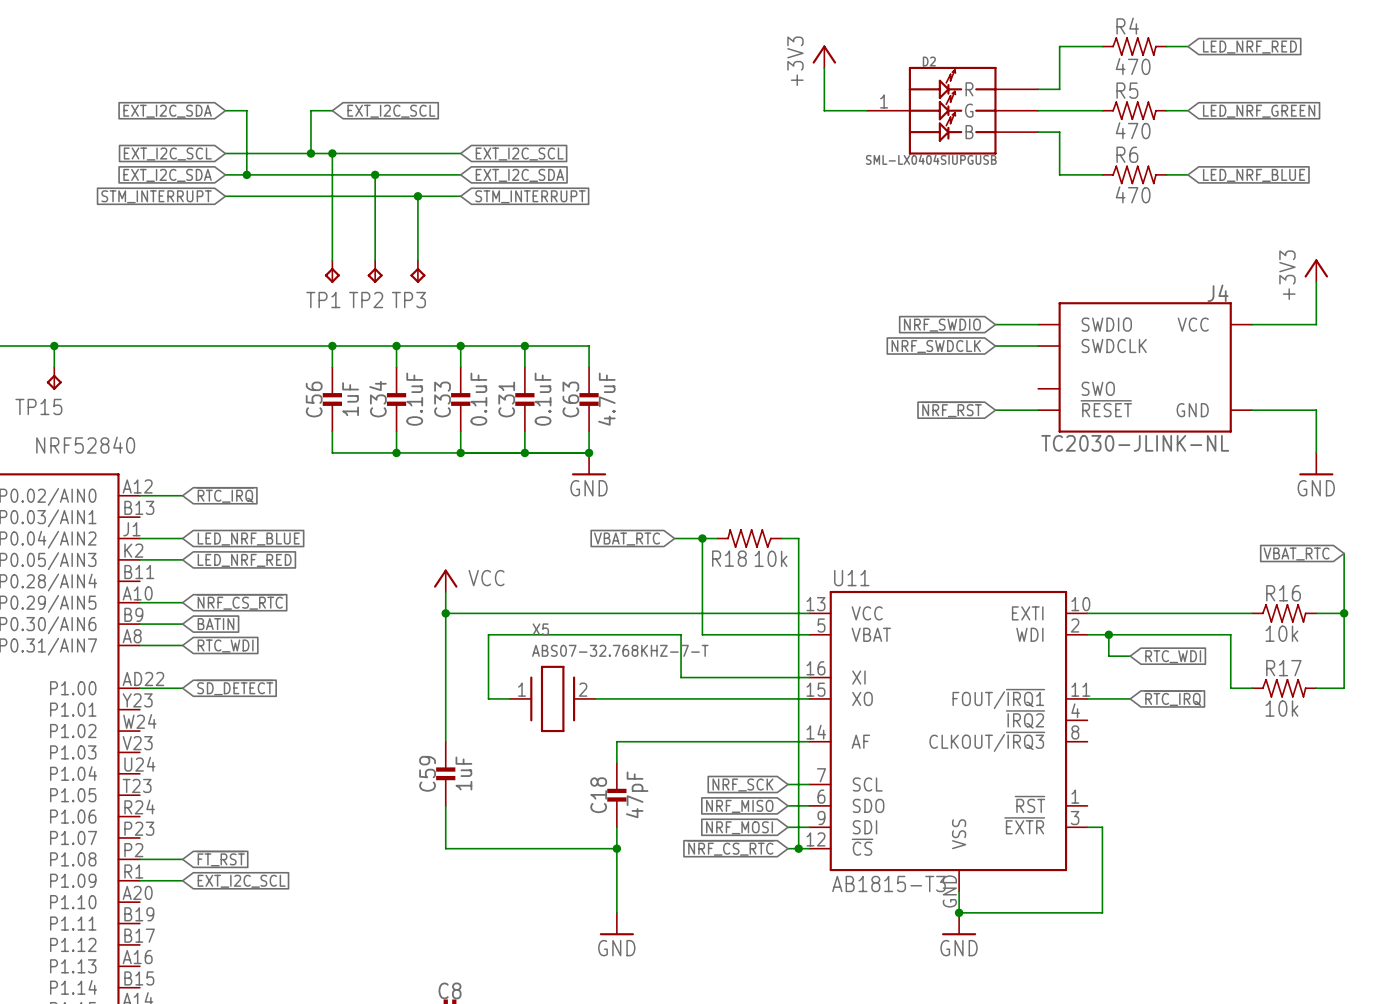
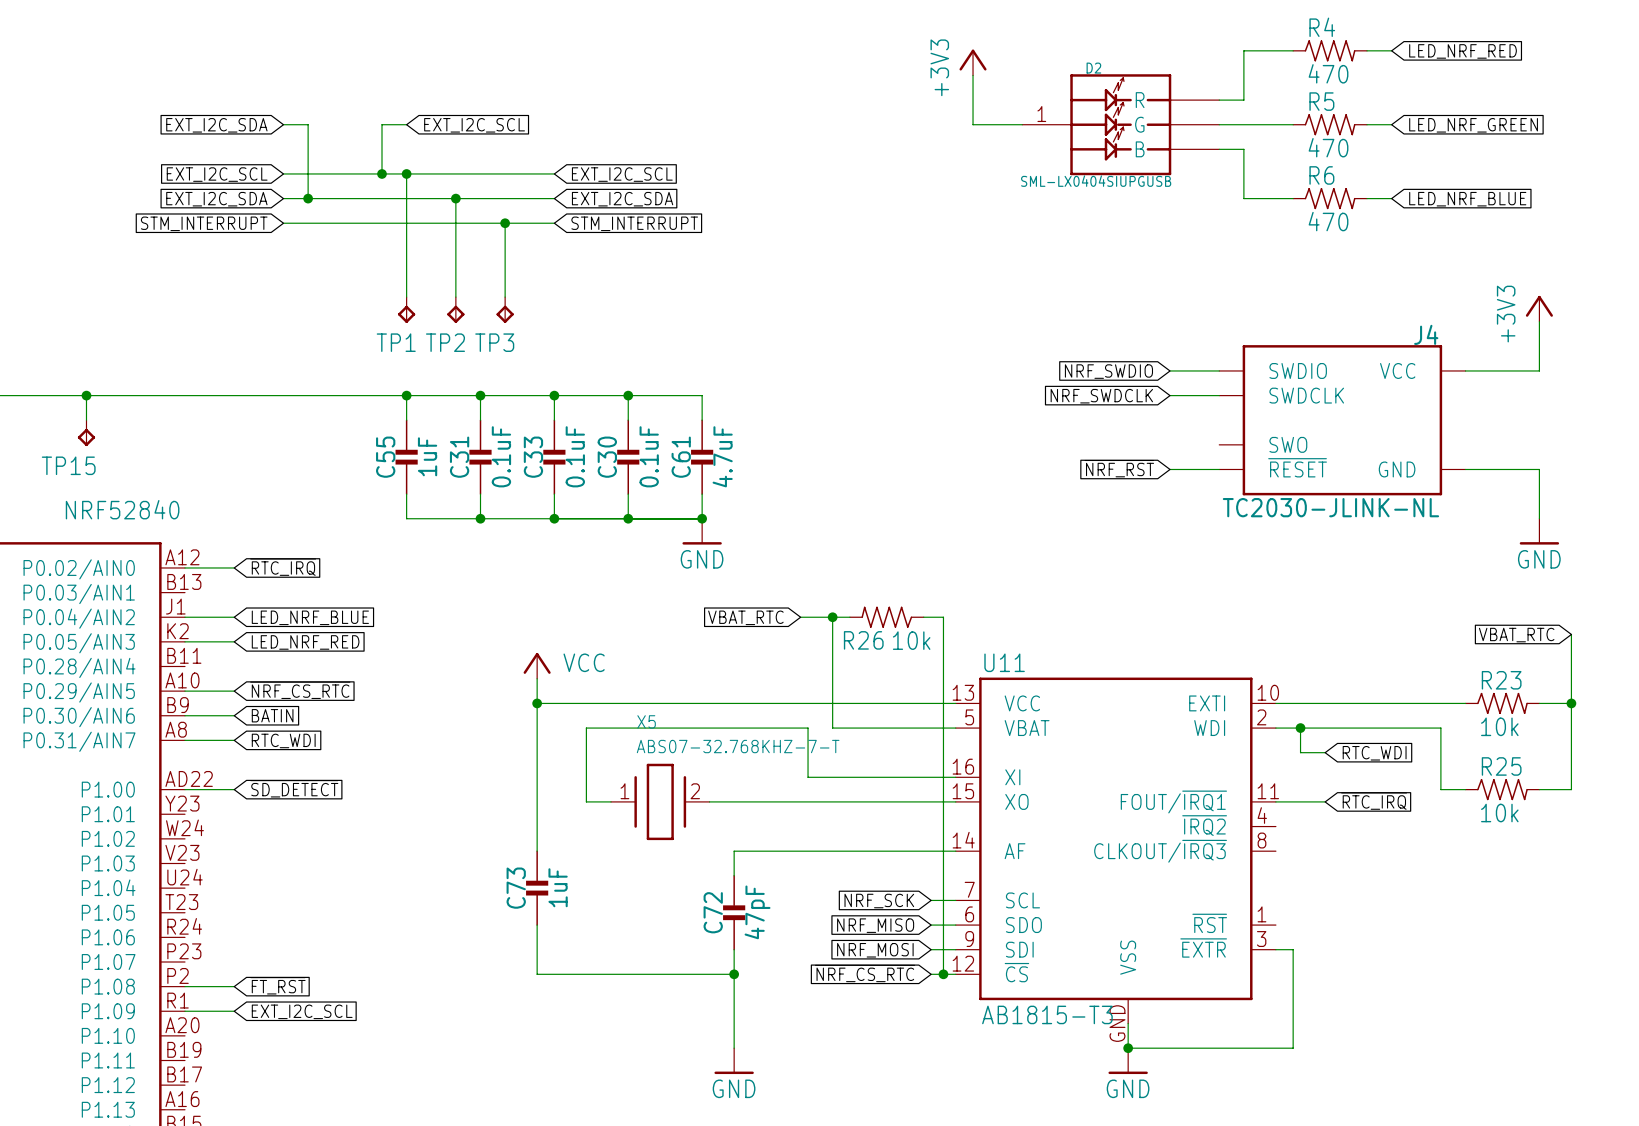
C56 name: C56 (314, 399) -> C55 (385, 457)
C34 name: C34 (378, 399) -> C31 (459, 457)
C31 name: C31 (506, 399) -> C30 (607, 457)
C63 name: C63 (570, 399) -> C61 (681, 457)
R18 name: R18 (729, 558) -> R26 (863, 640)
R16 name: R16 (1283, 593) -> R23 (1501, 680)
R17 name: R17 (1283, 668) -> R25 (1501, 766)
C59 name: C59 (427, 773) -> C73 (516, 888)
C18 name: C18 (598, 795) -> C72 (713, 912)

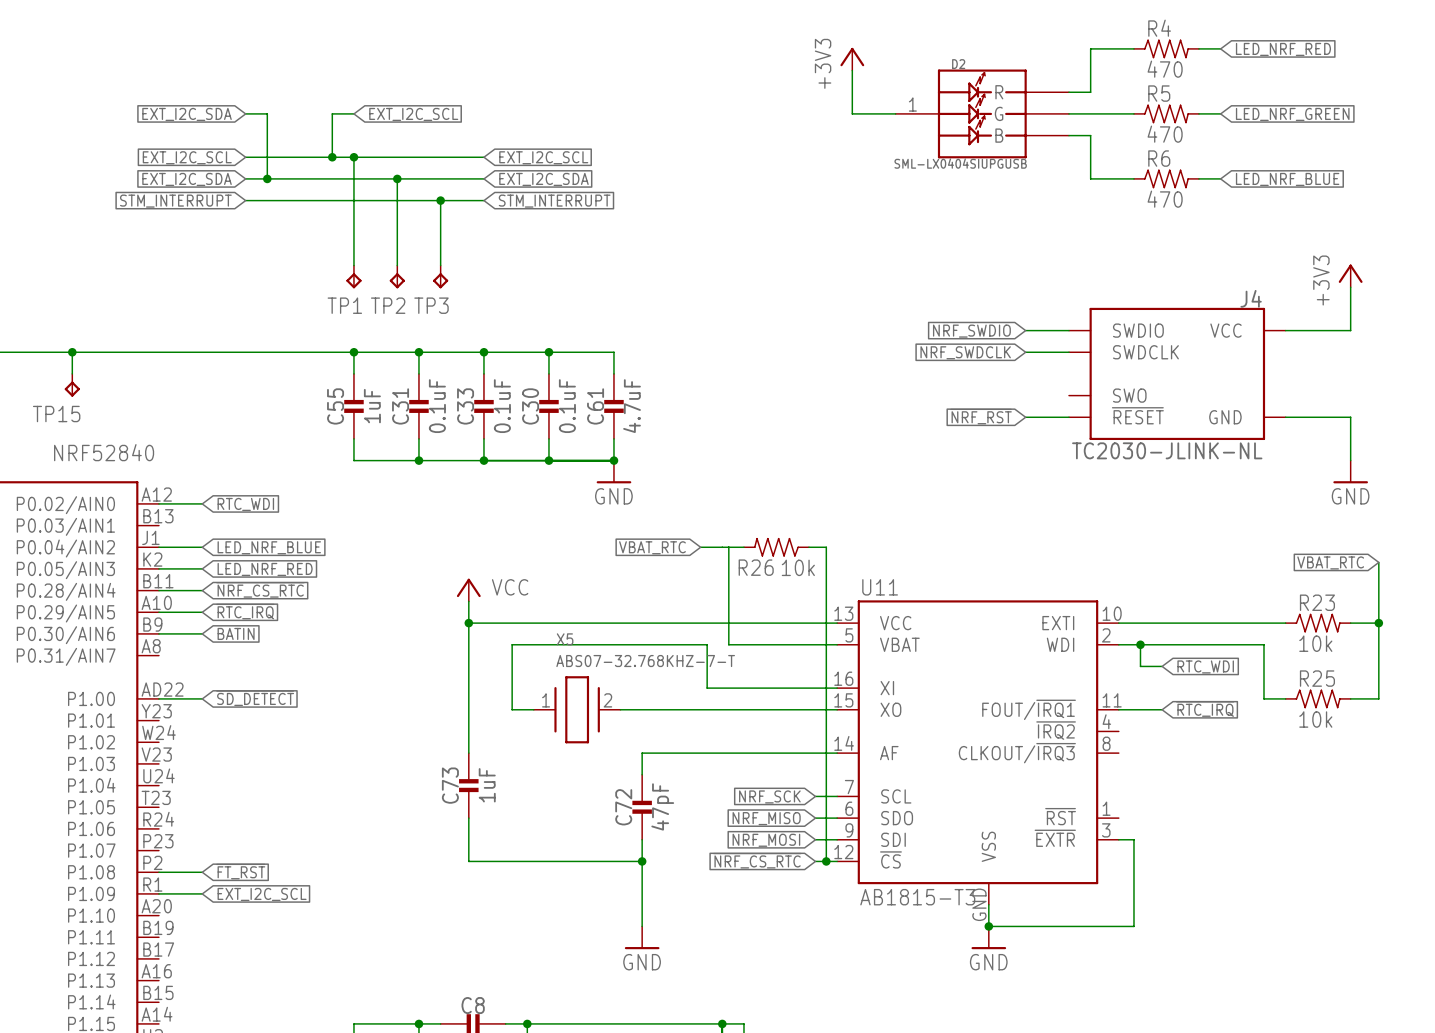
global label: ~{RTC_IRQ} (283, 567) -> RTC_WDI (245, 504)
junction: (832, 617) -> none
global label: none -> ~{NRF_CS_RTC} (260, 589)
global label: ~{NRF_CS_RTC} (300, 690) -> ~{RTC_IRQ} (245, 611)
wire: (184, 740) (234, 740) -> (158, 590) (202, 590)
global label: RTC_WDI (283, 740) -> none

